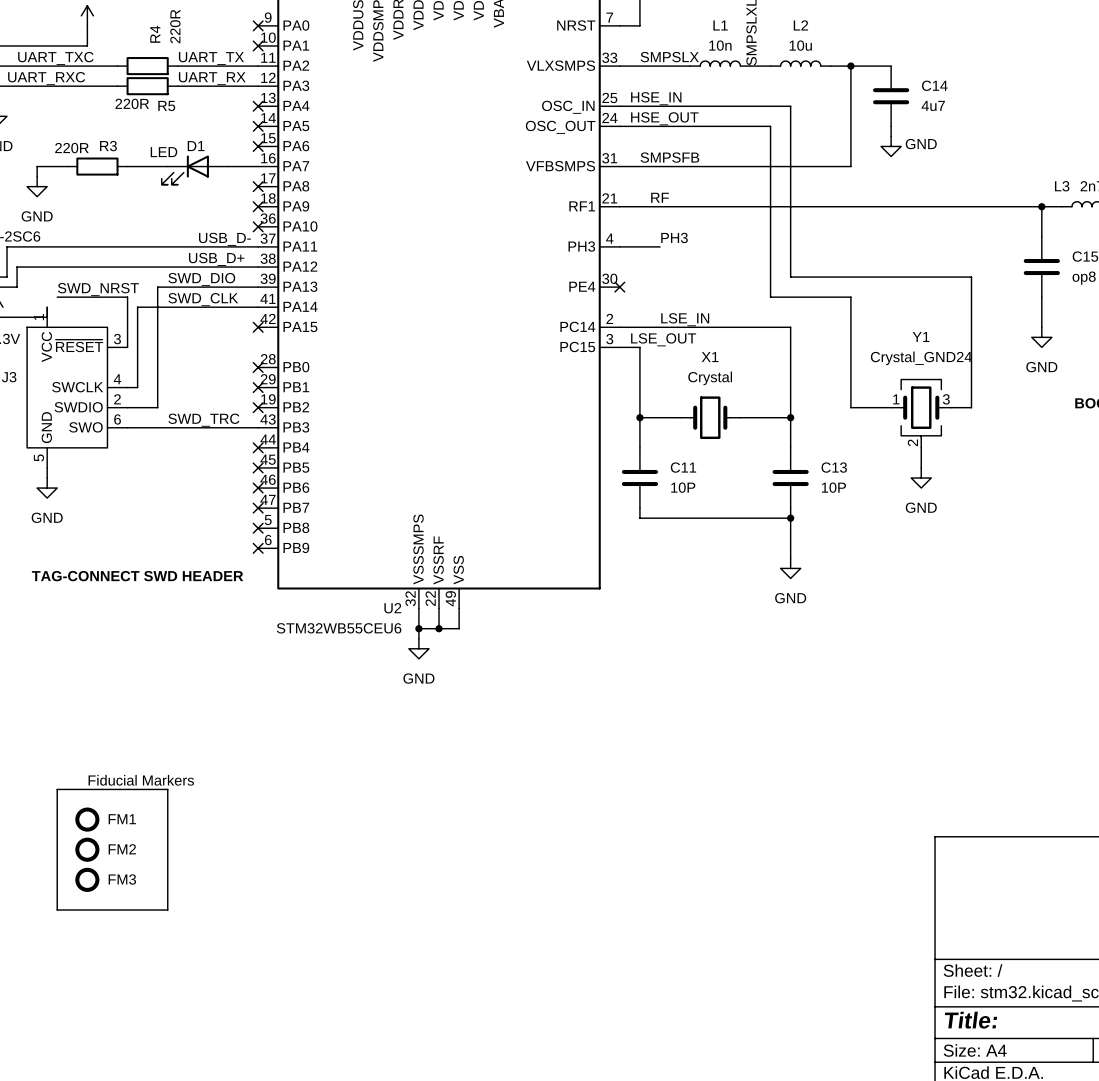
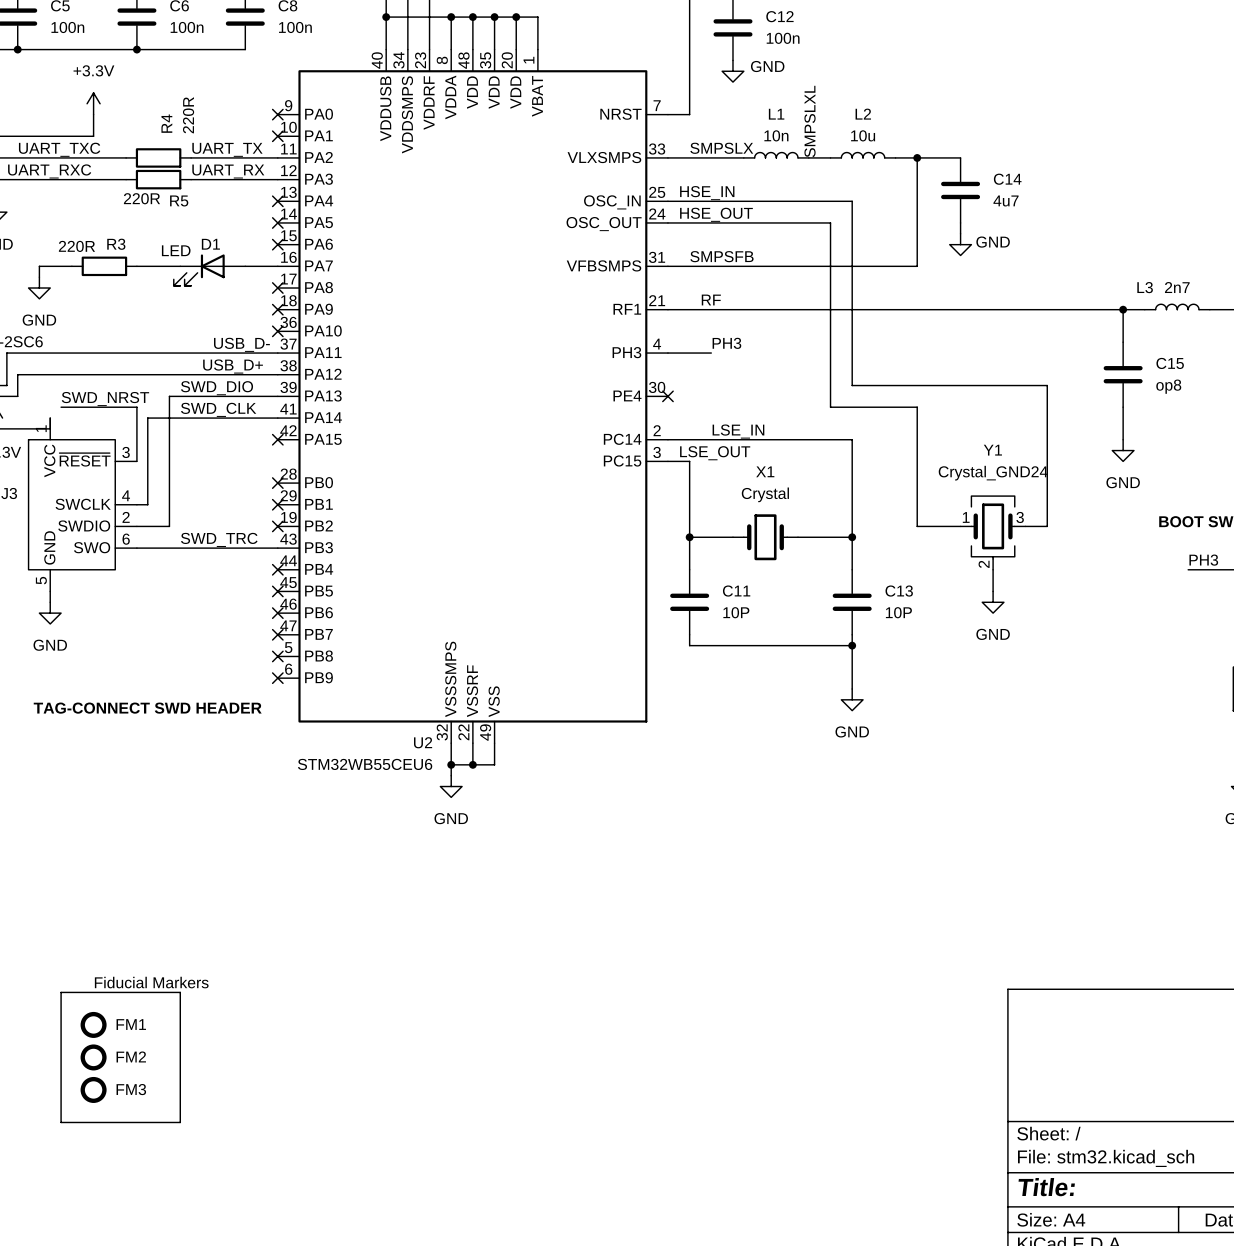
label position: Fiducial Markers (141, 780) -> Fiducial Markers (151, 982)
FM1 position: (87, 819) -> (93, 1024)
line: (57, 839) (57, 789) (167, 789) (167, 839) -> (61, 992) (180, 992)
FM2 position: (87, 849) -> (93, 1057)
FM3 position: (87, 879) -> (93, 1089)
line: (57, 910) (167, 910) -> (61, 1068) (61, 1122) (180, 1122) (180, 1068)

